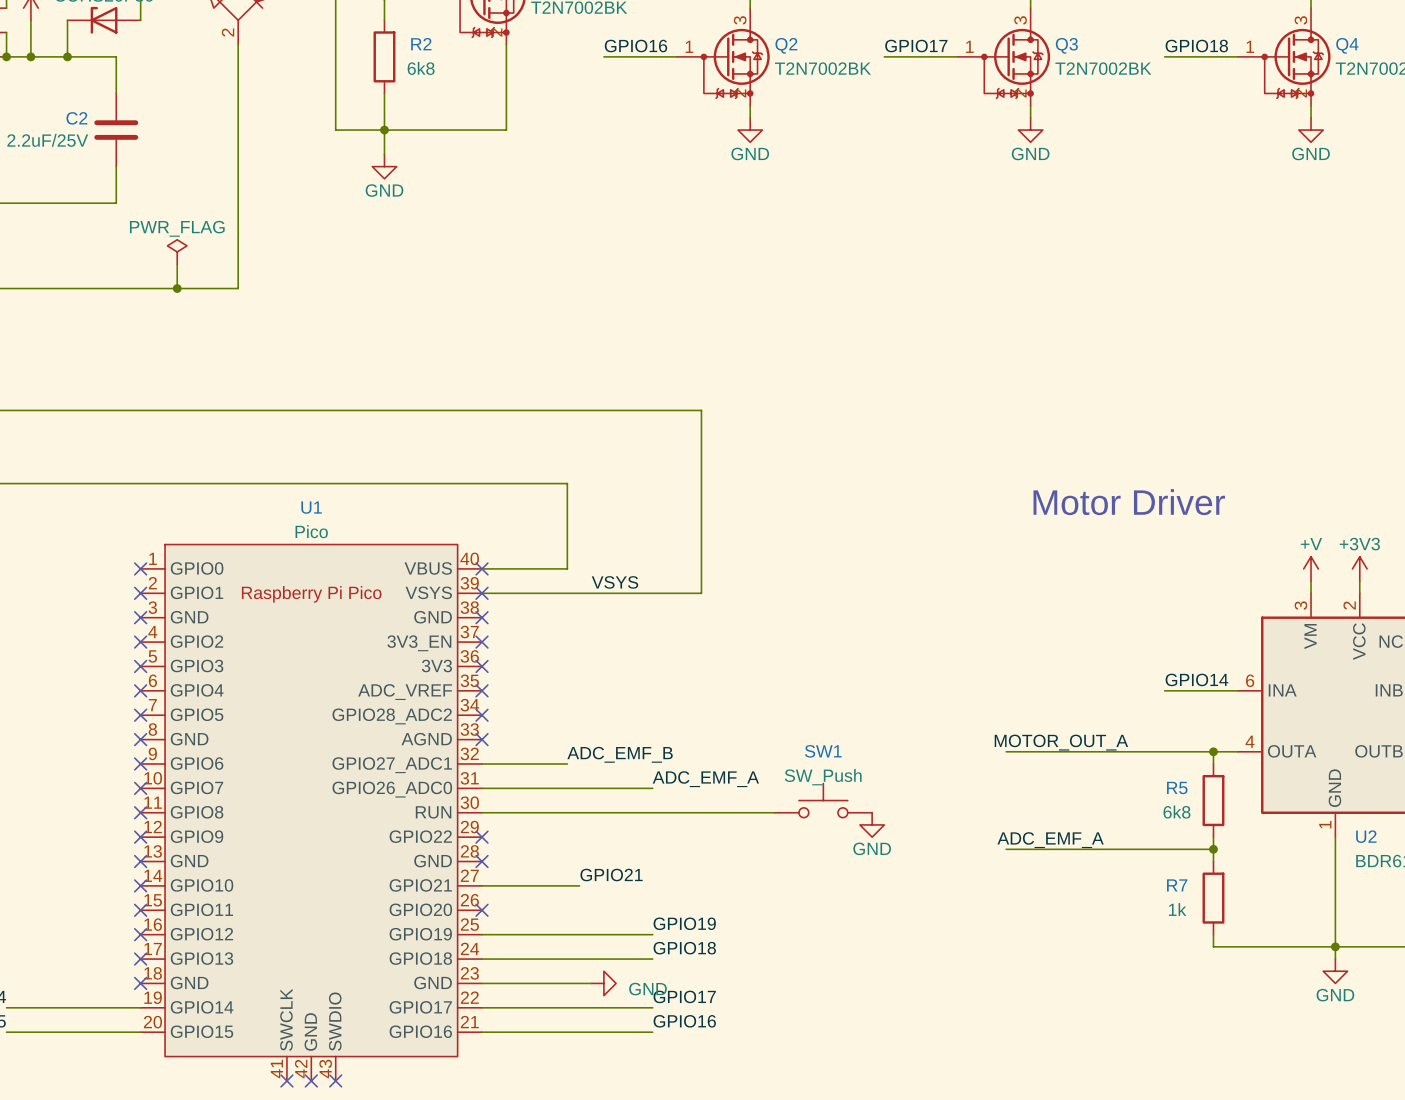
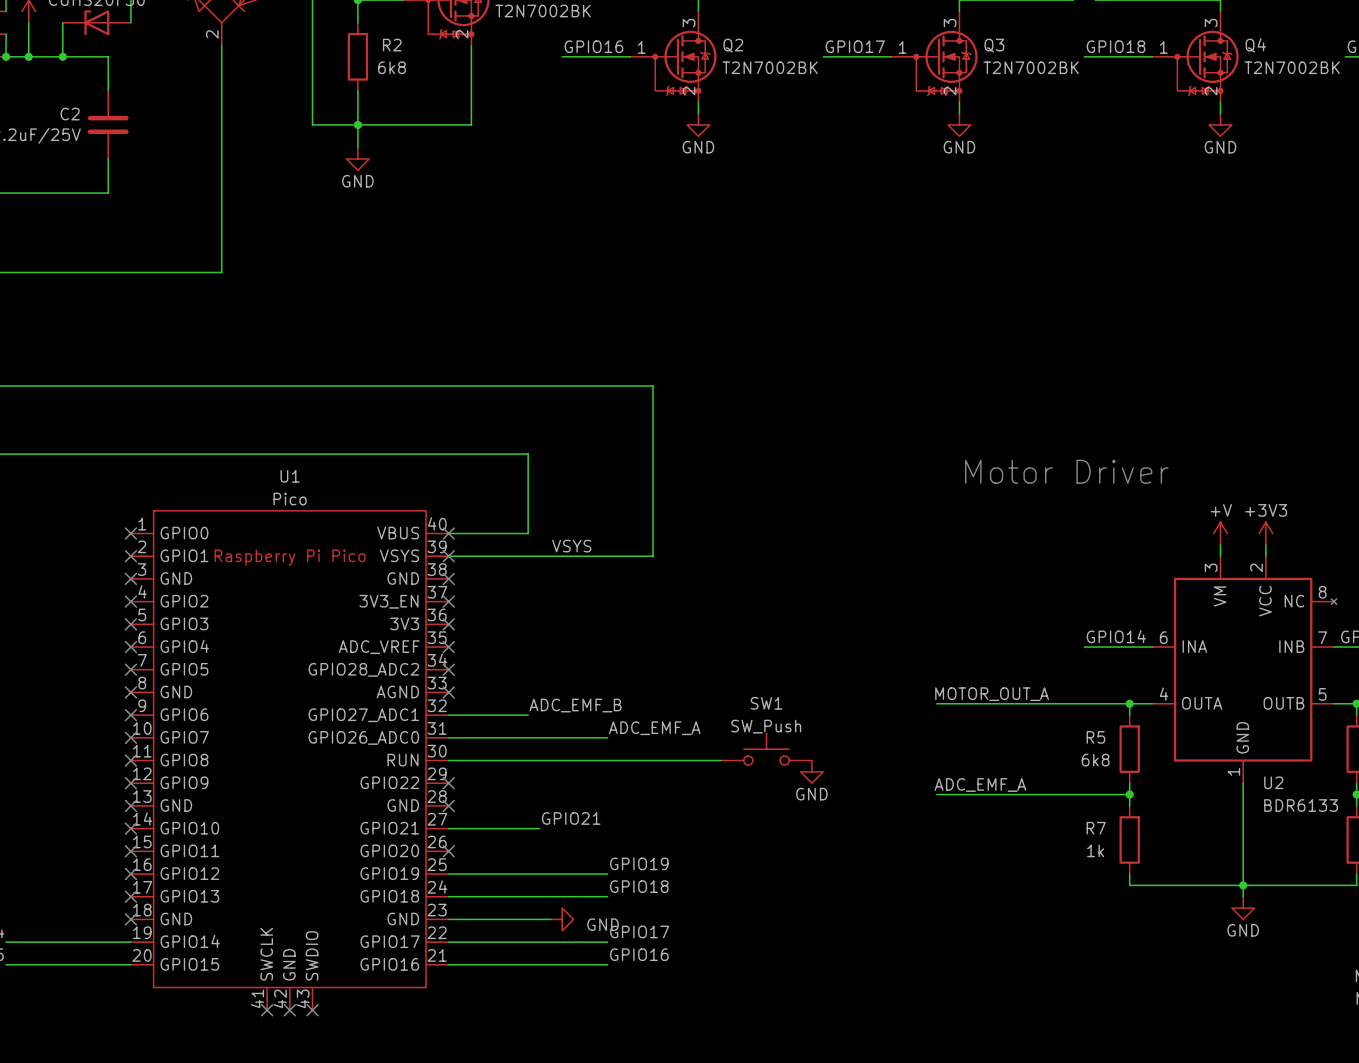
power symbol: PWR_FLAG (177, 251) -> none
wire: (177, 264) (177, 288) -> none
junction: (177, 288) -> none

